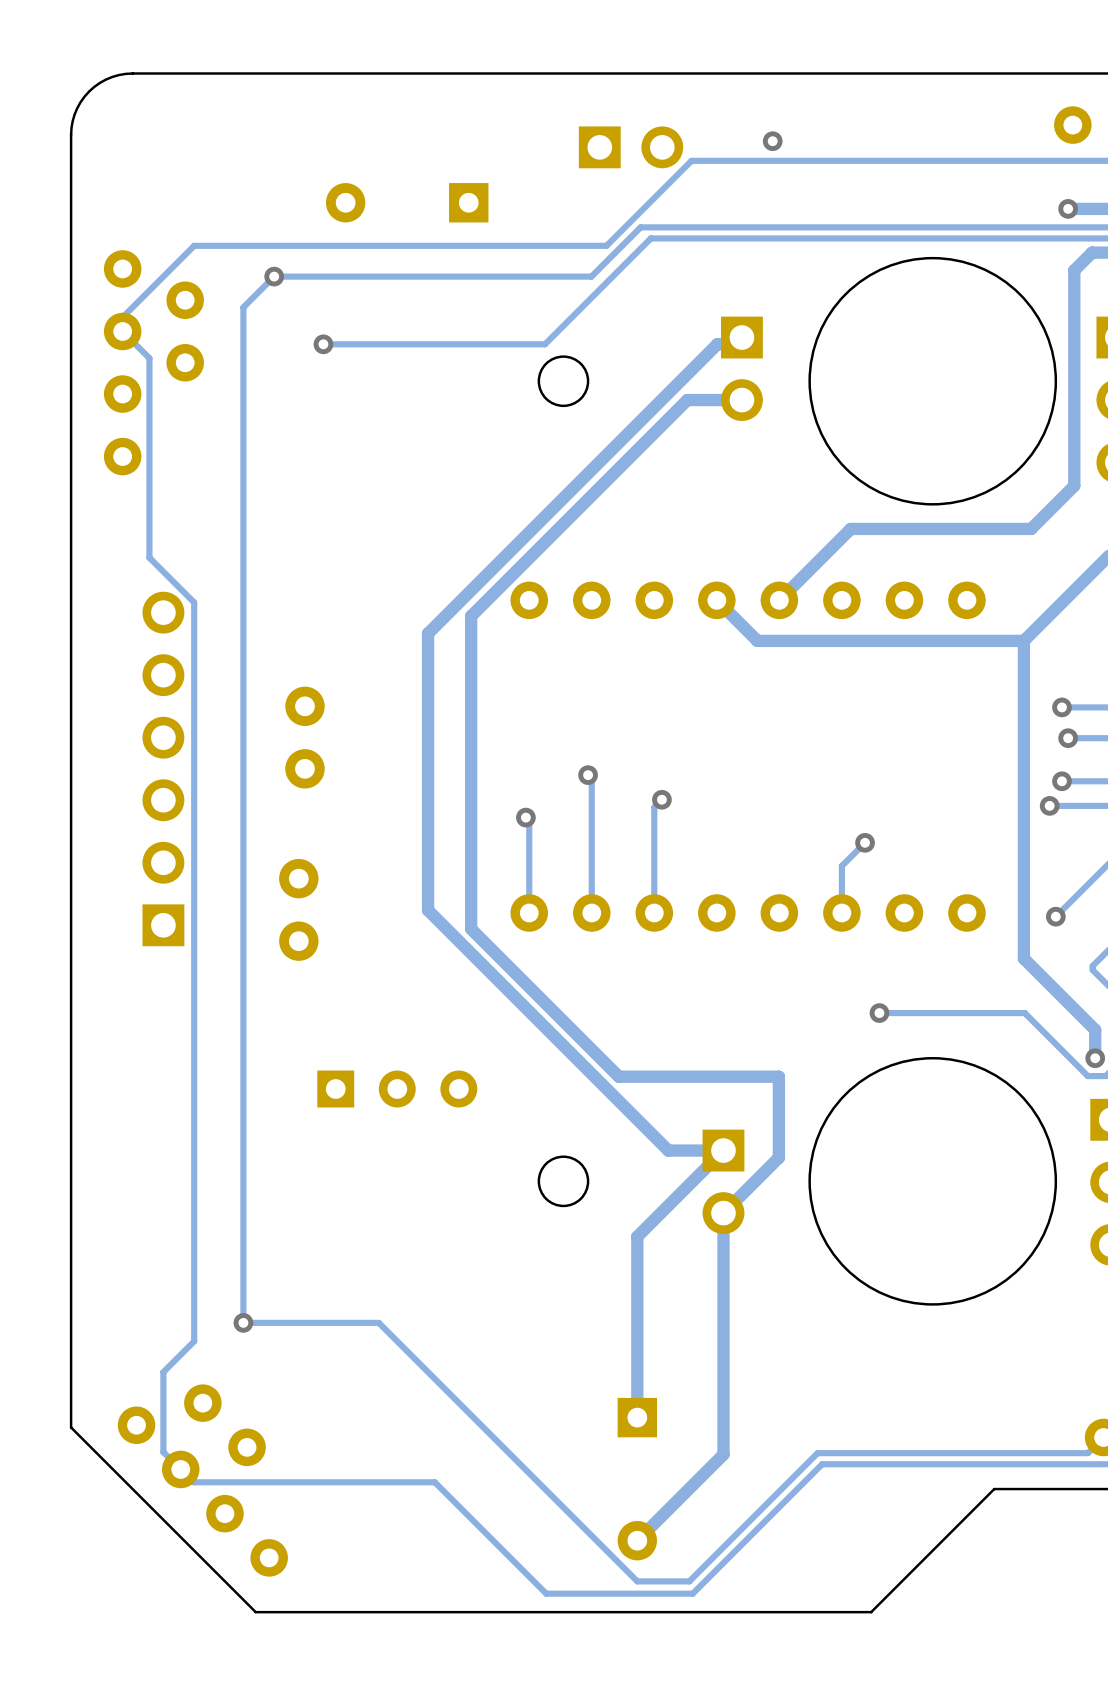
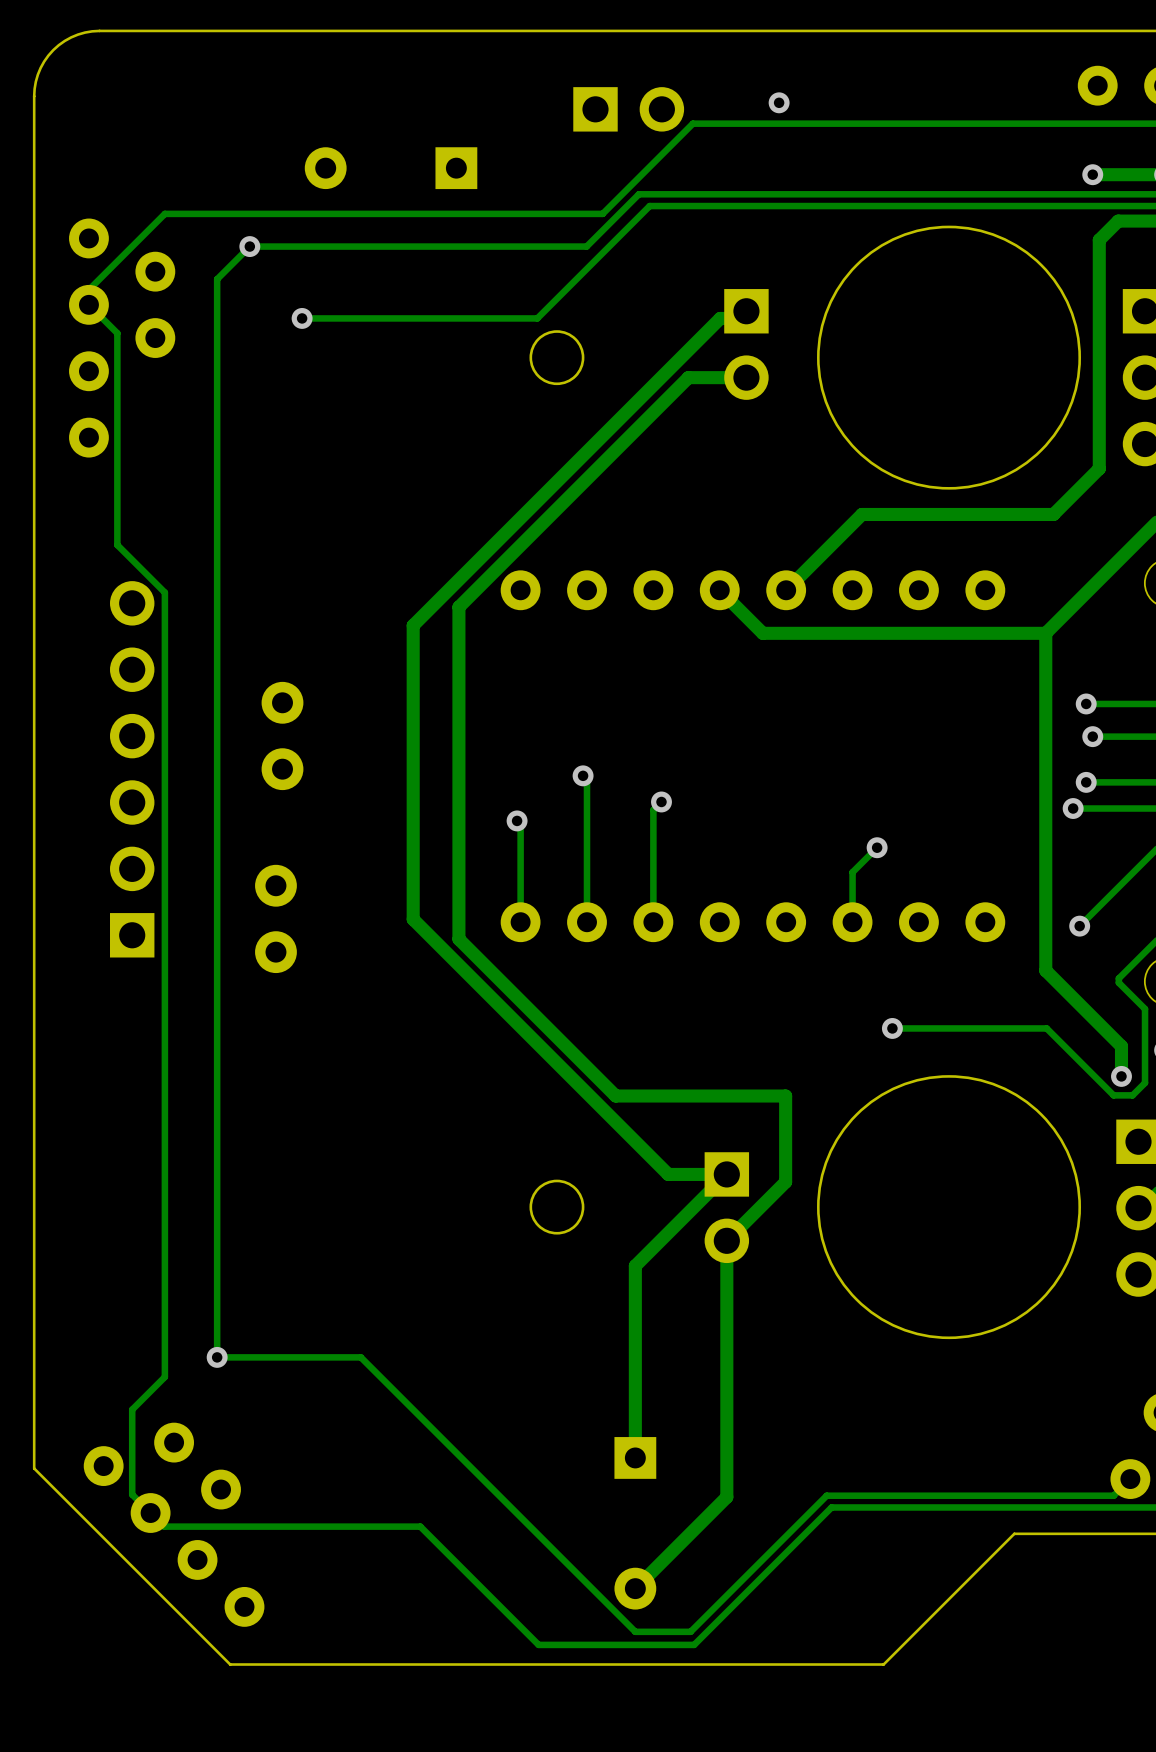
part: (397, 1089) -> none

